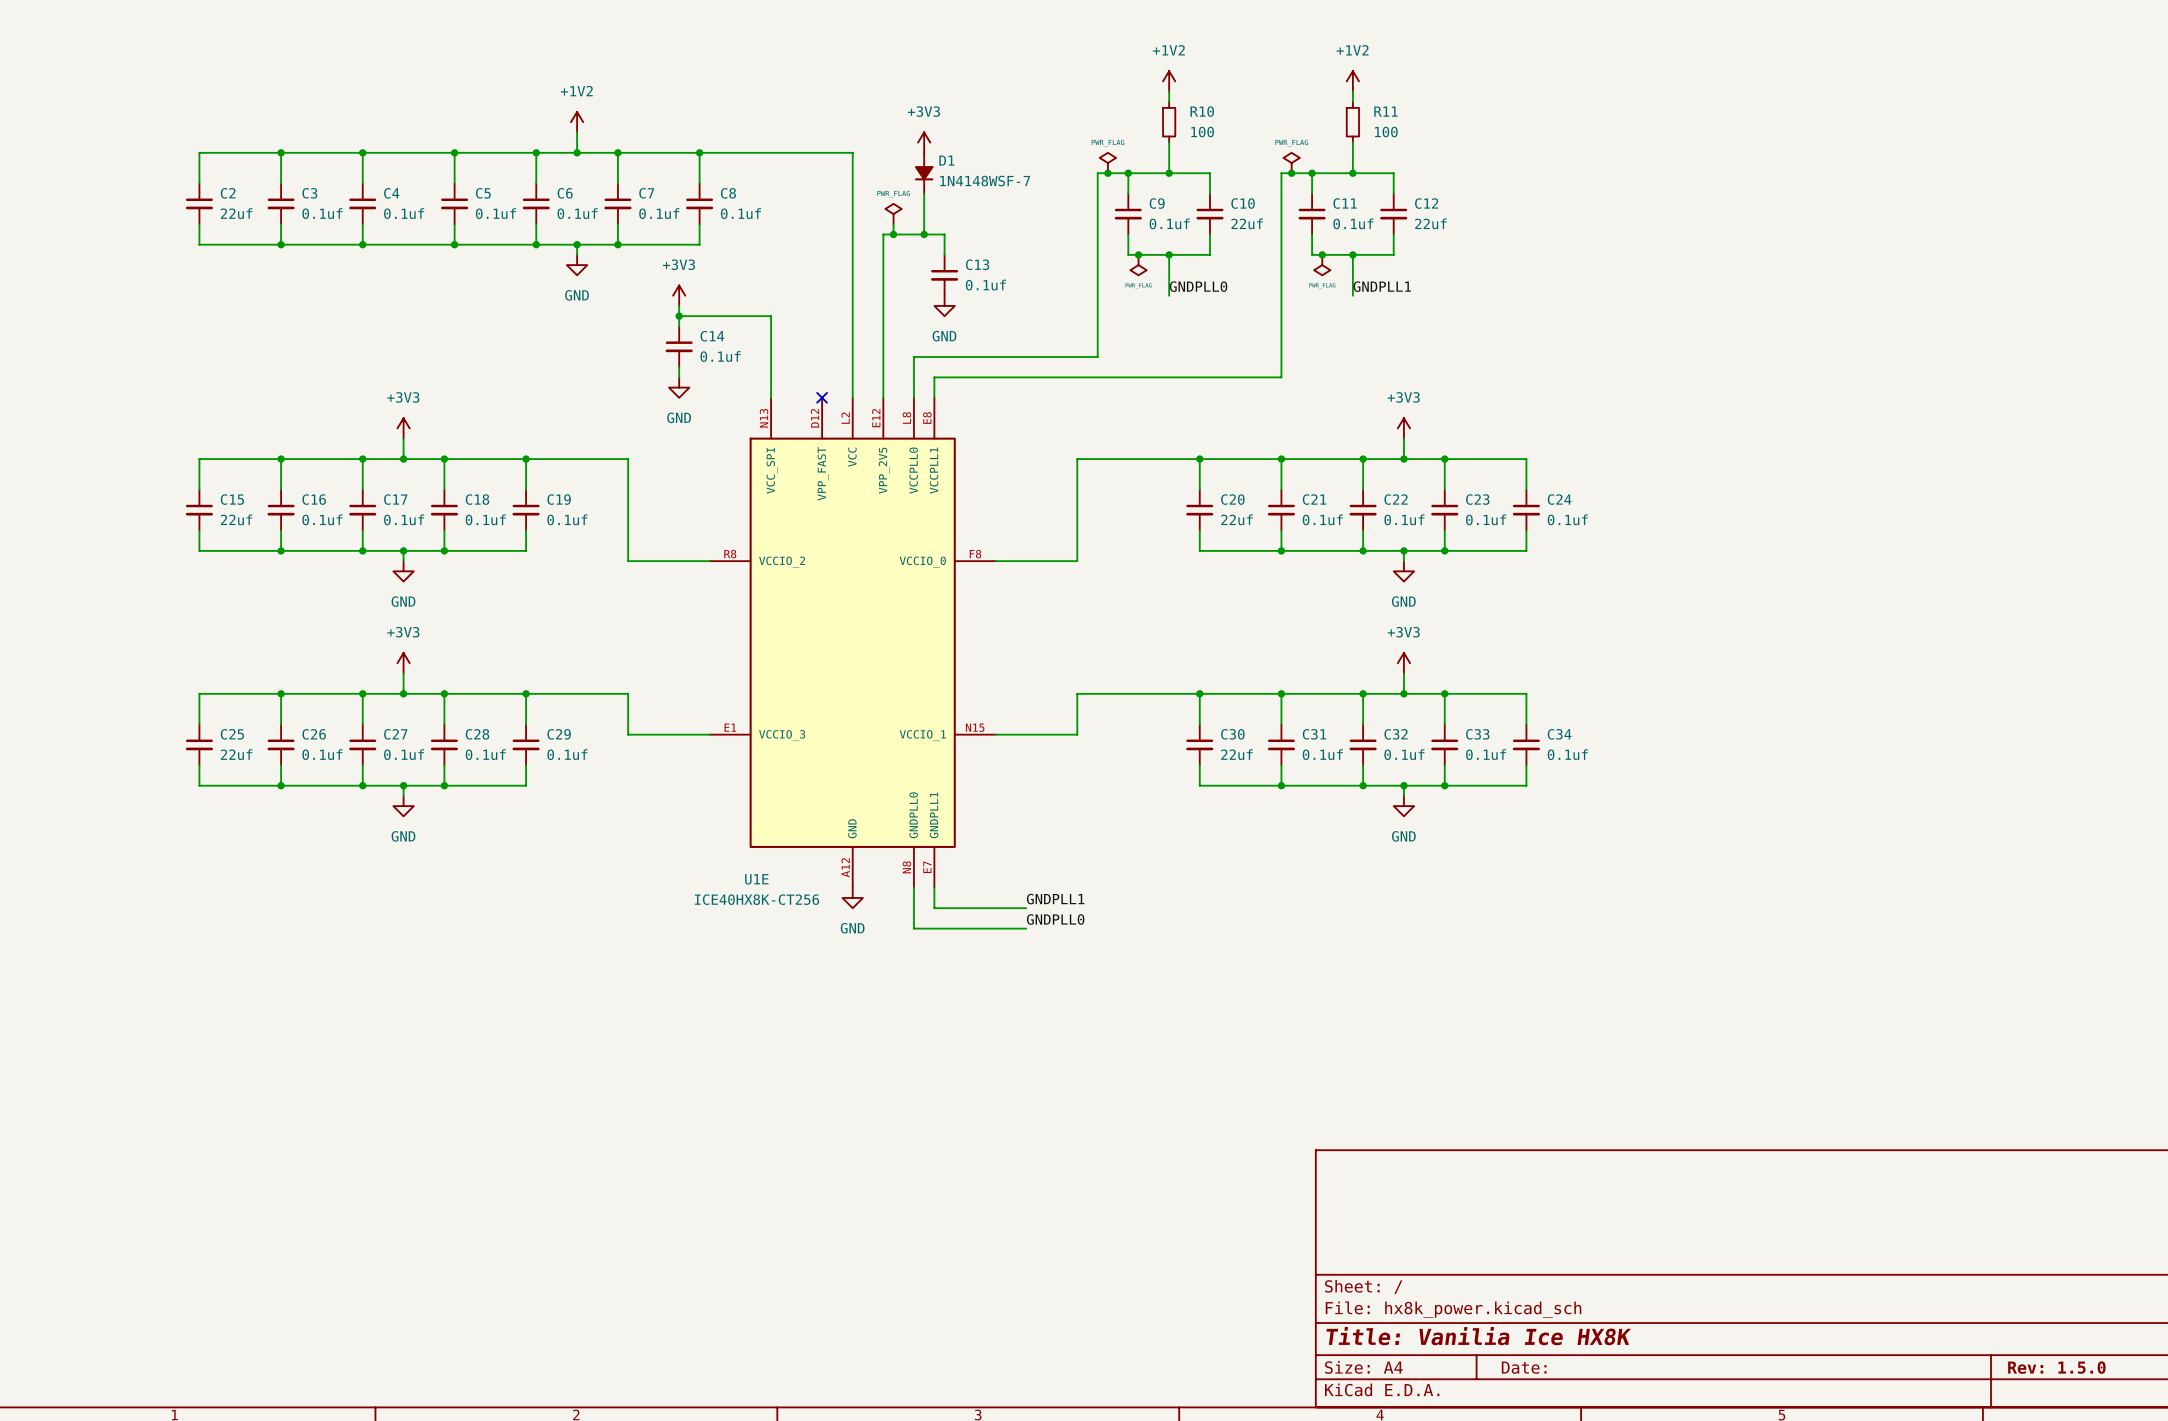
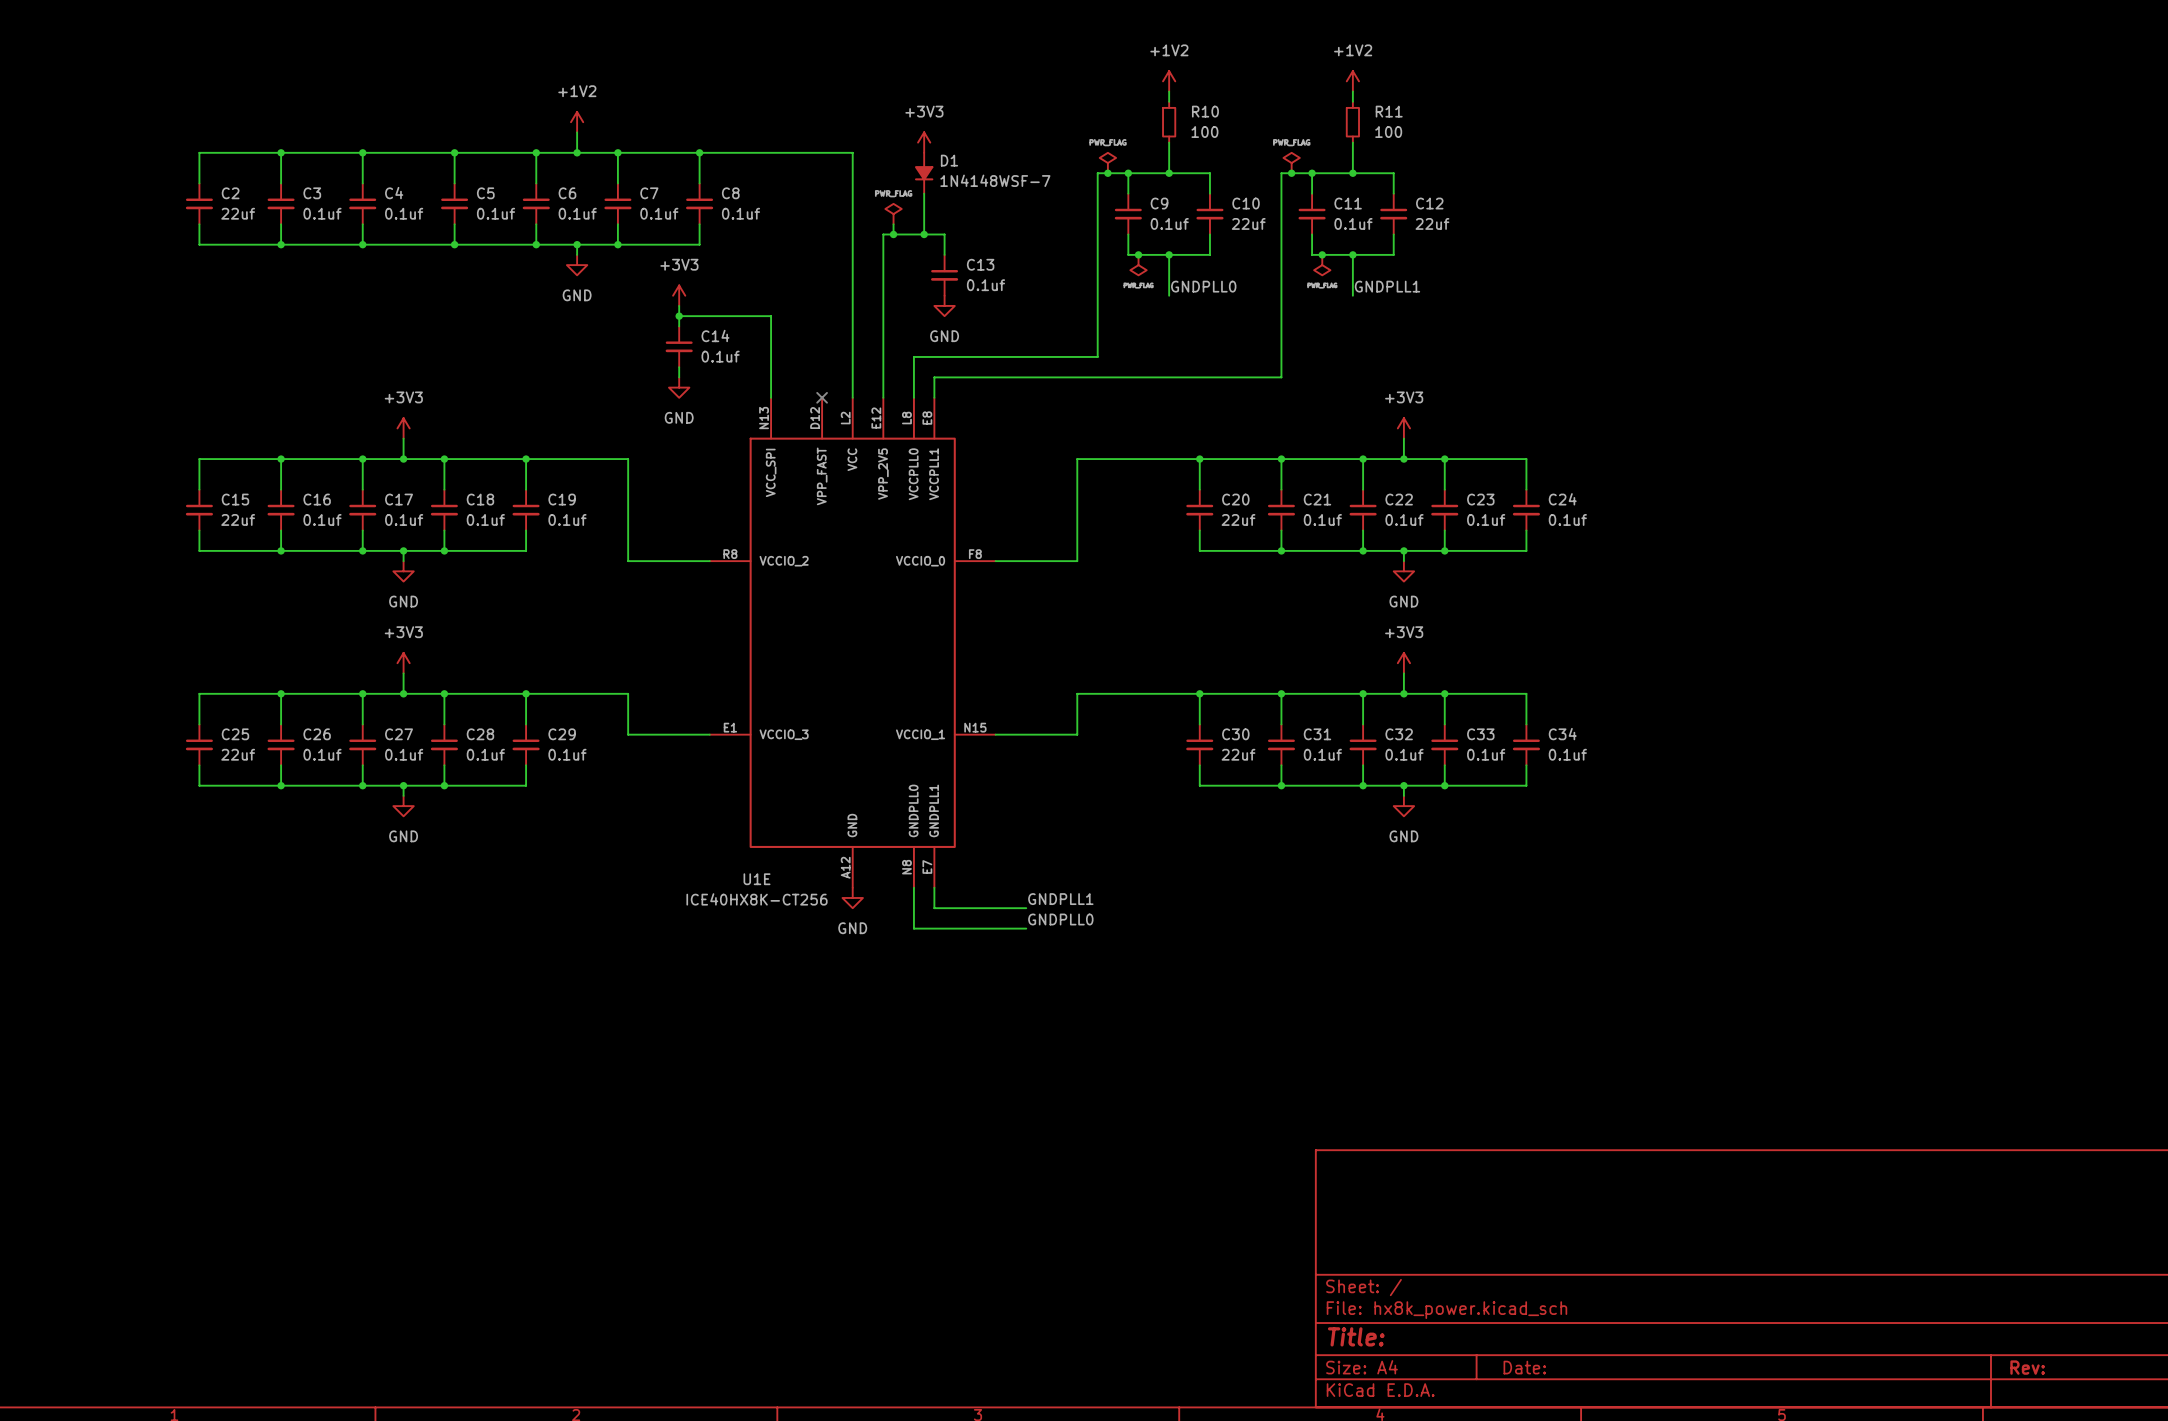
title block: Title: Vanilia Ice HX8K (1478, 1336) -> Title: (1356, 1336)
title block: Rev: 1.5.0 (2056, 1367) -> Rev: (2027, 1367)

